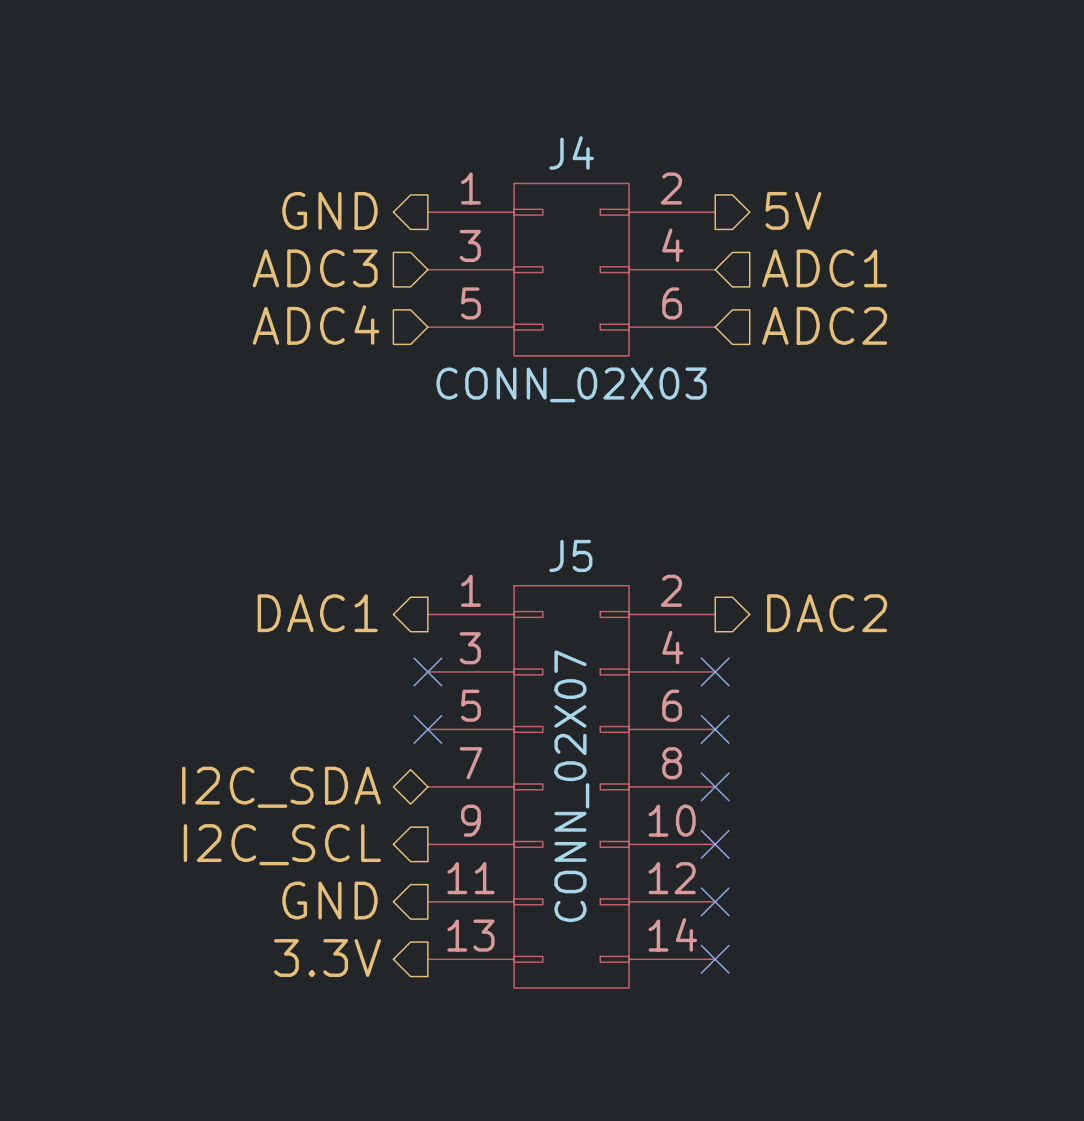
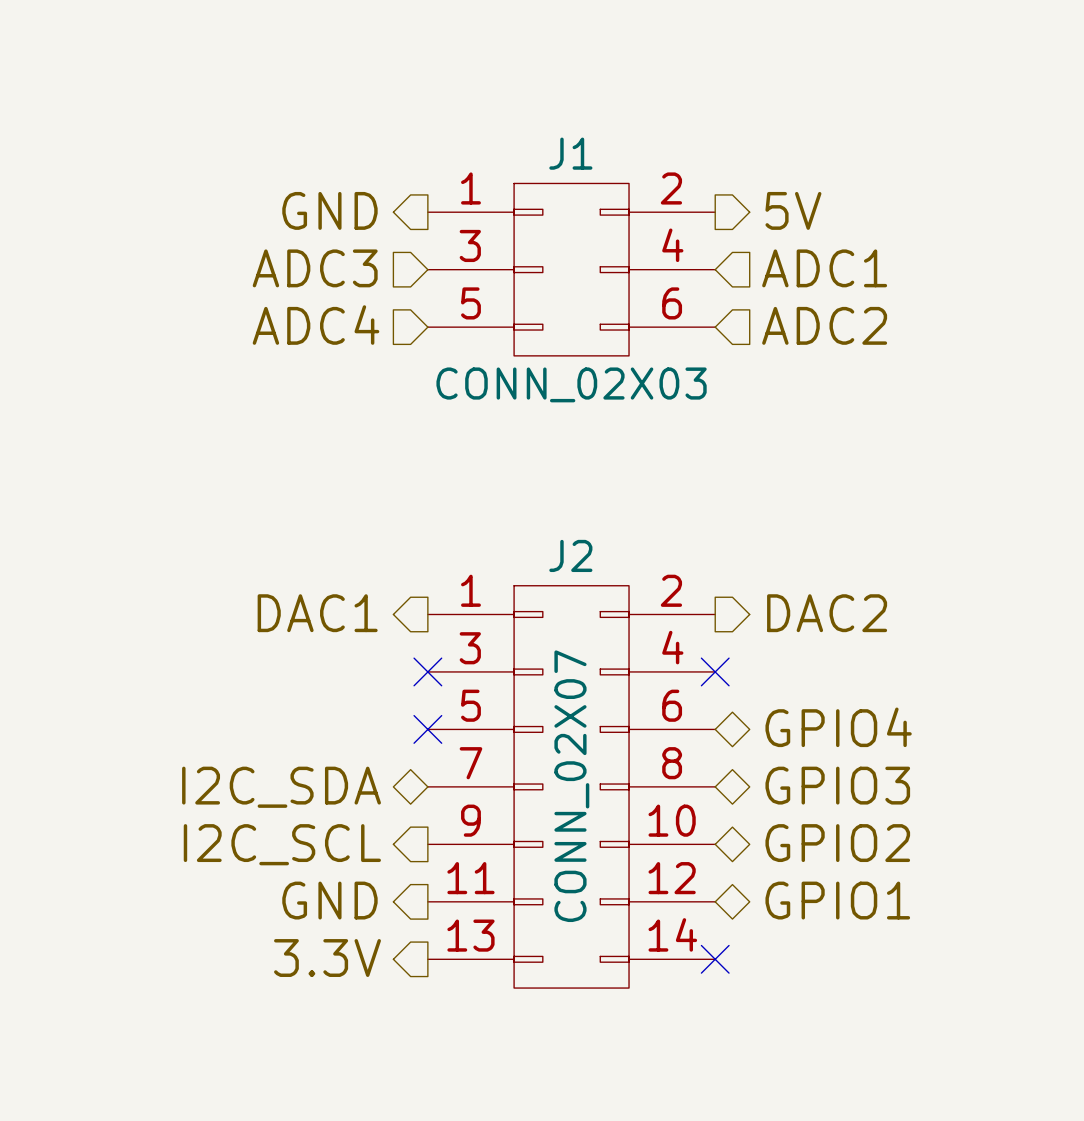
J4 name: J4 (571, 152) -> J1 (570, 153)
J5 name: J5 (570, 555) -> J2 (570, 555)
hierarchical label: none -> GPIO4 (838, 727)
no-connect mark: (715, 729) -> none
hierarchical label: none -> GPIO3 (837, 785)
no-connect mark: (715, 786) -> none
hierarchical label: none -> GPIO2 (837, 843)
no-connect mark: (715, 844) -> none
hierarchical label: none -> GPIO1 (837, 900)
no-connect mark: (715, 901) -> none

